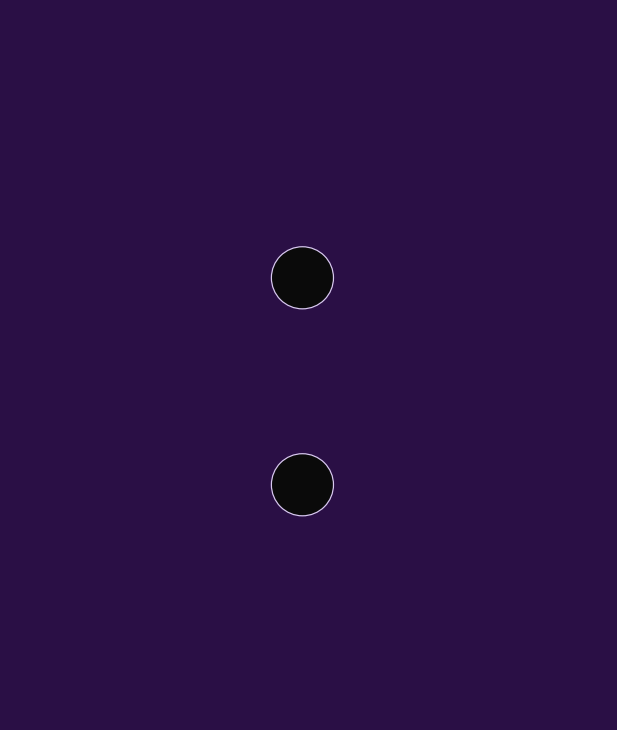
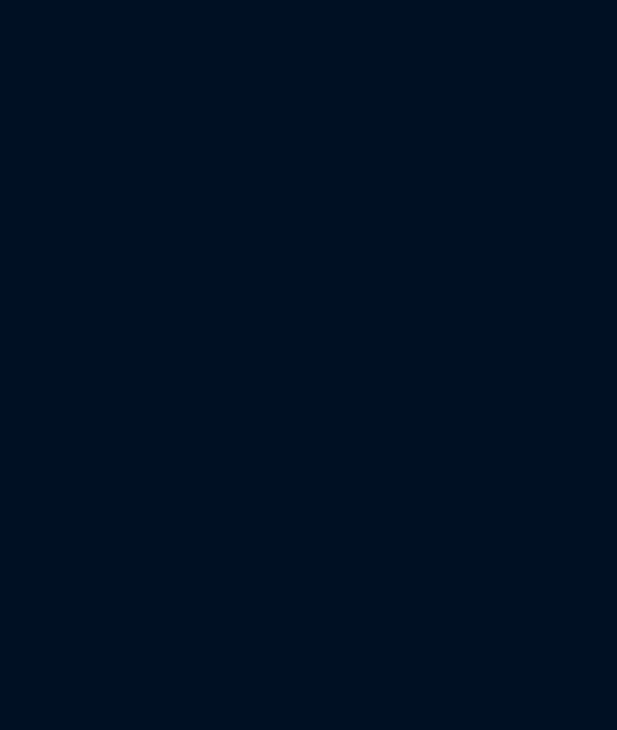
part: (302, 381) -> none

